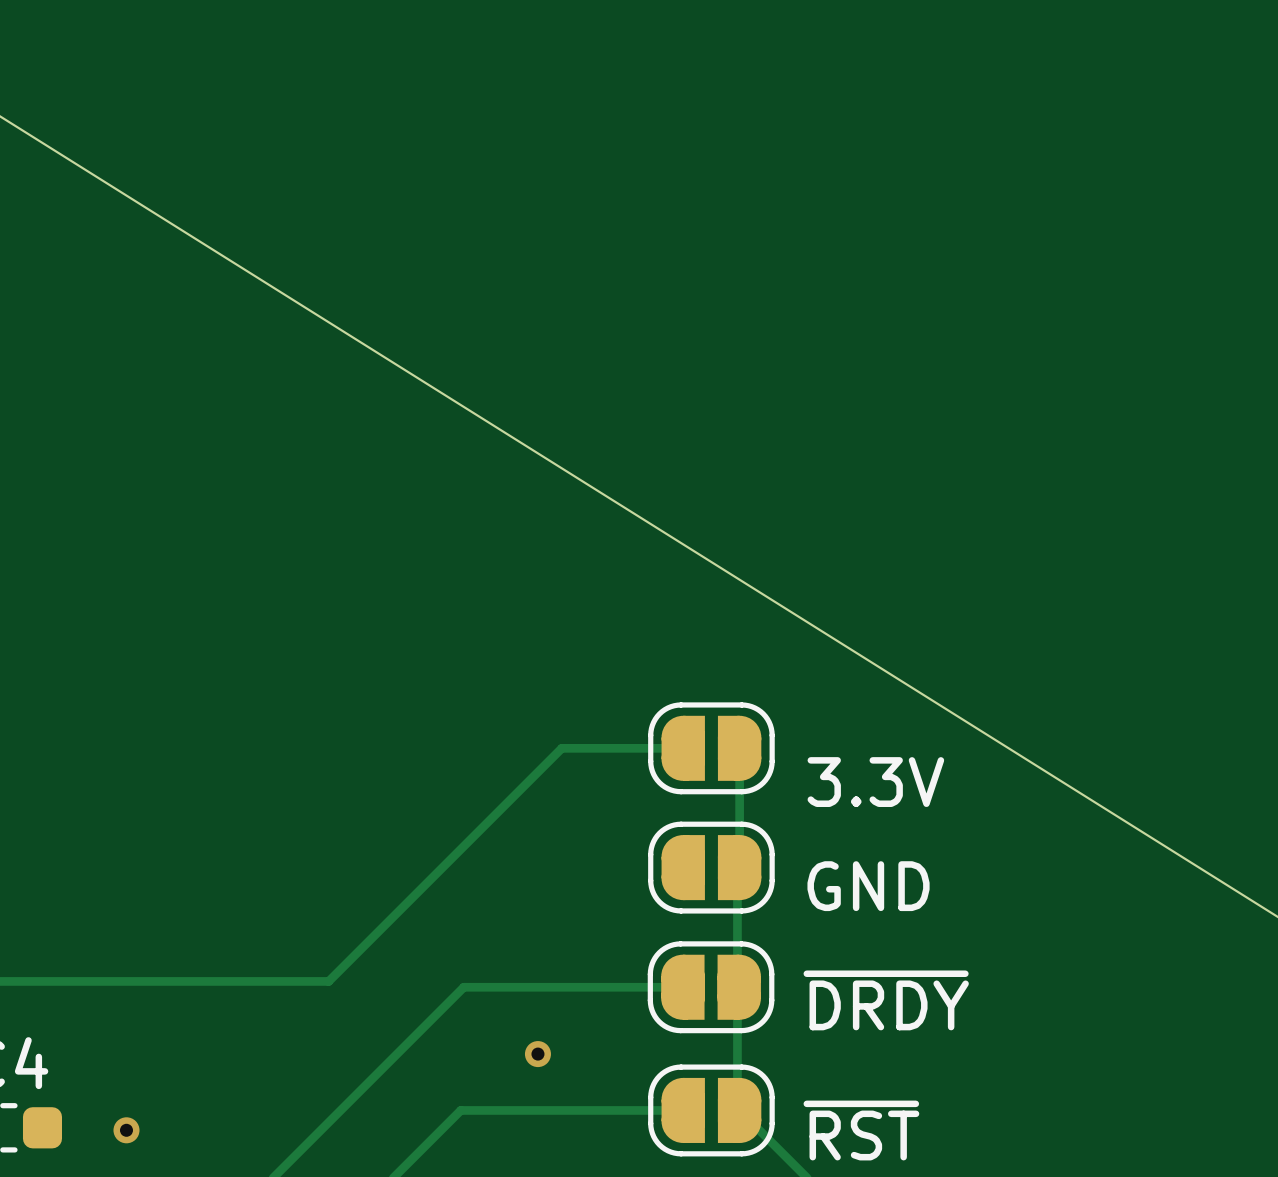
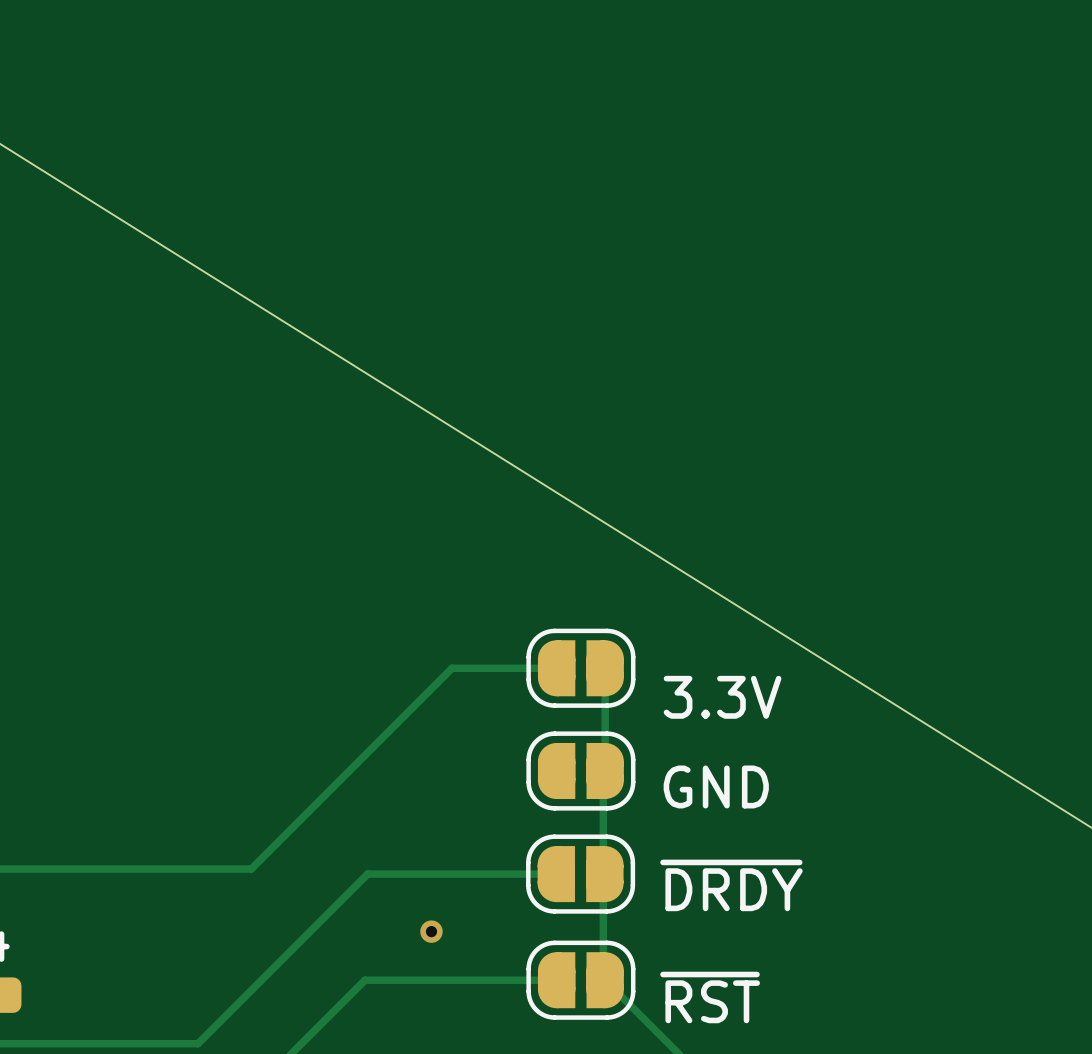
via: (126, 1130) -> none

